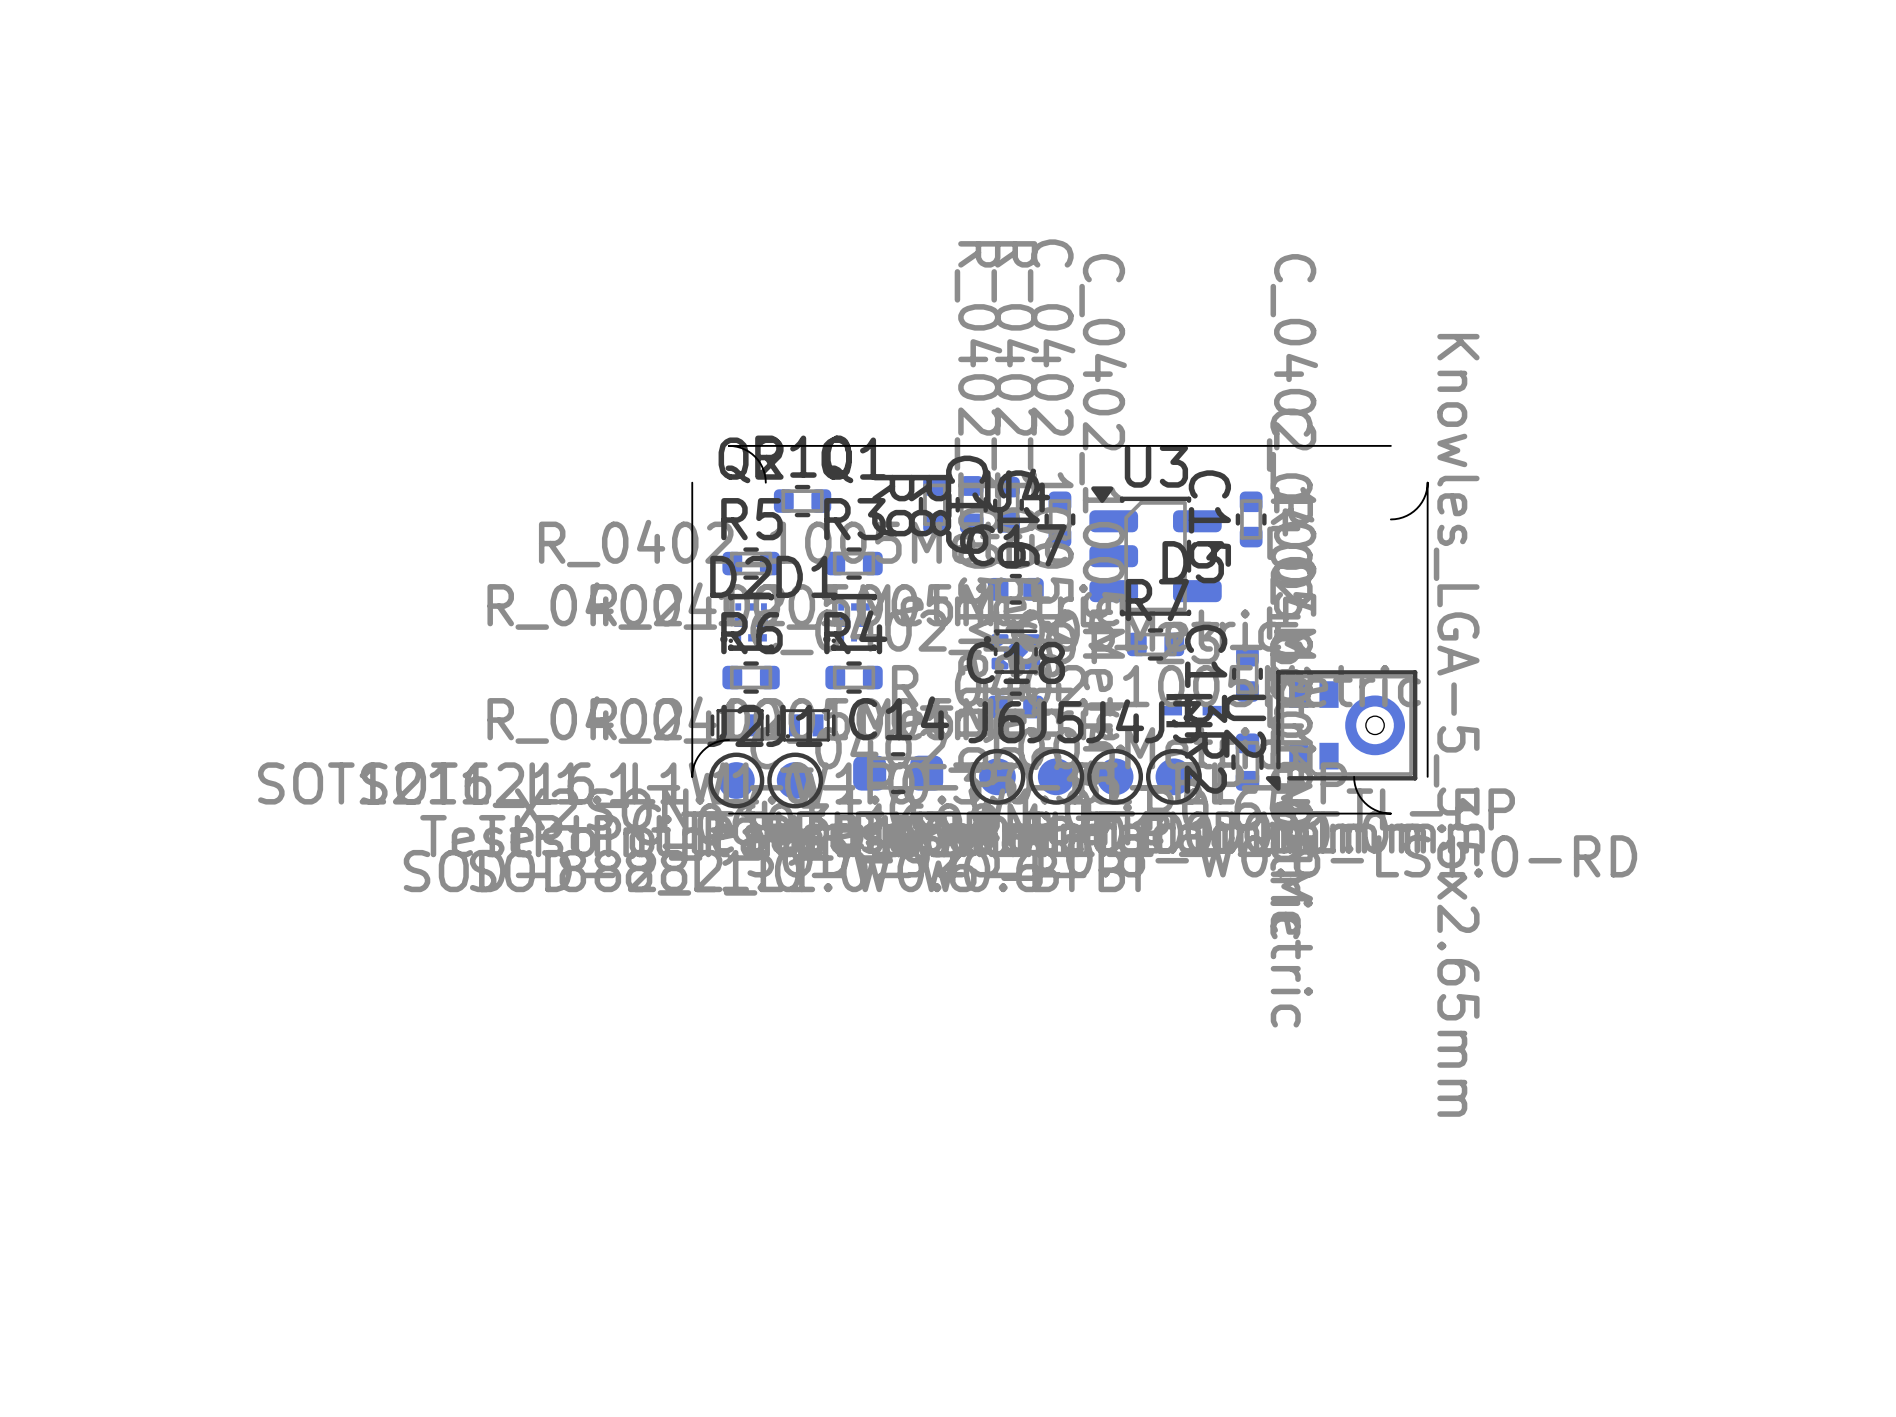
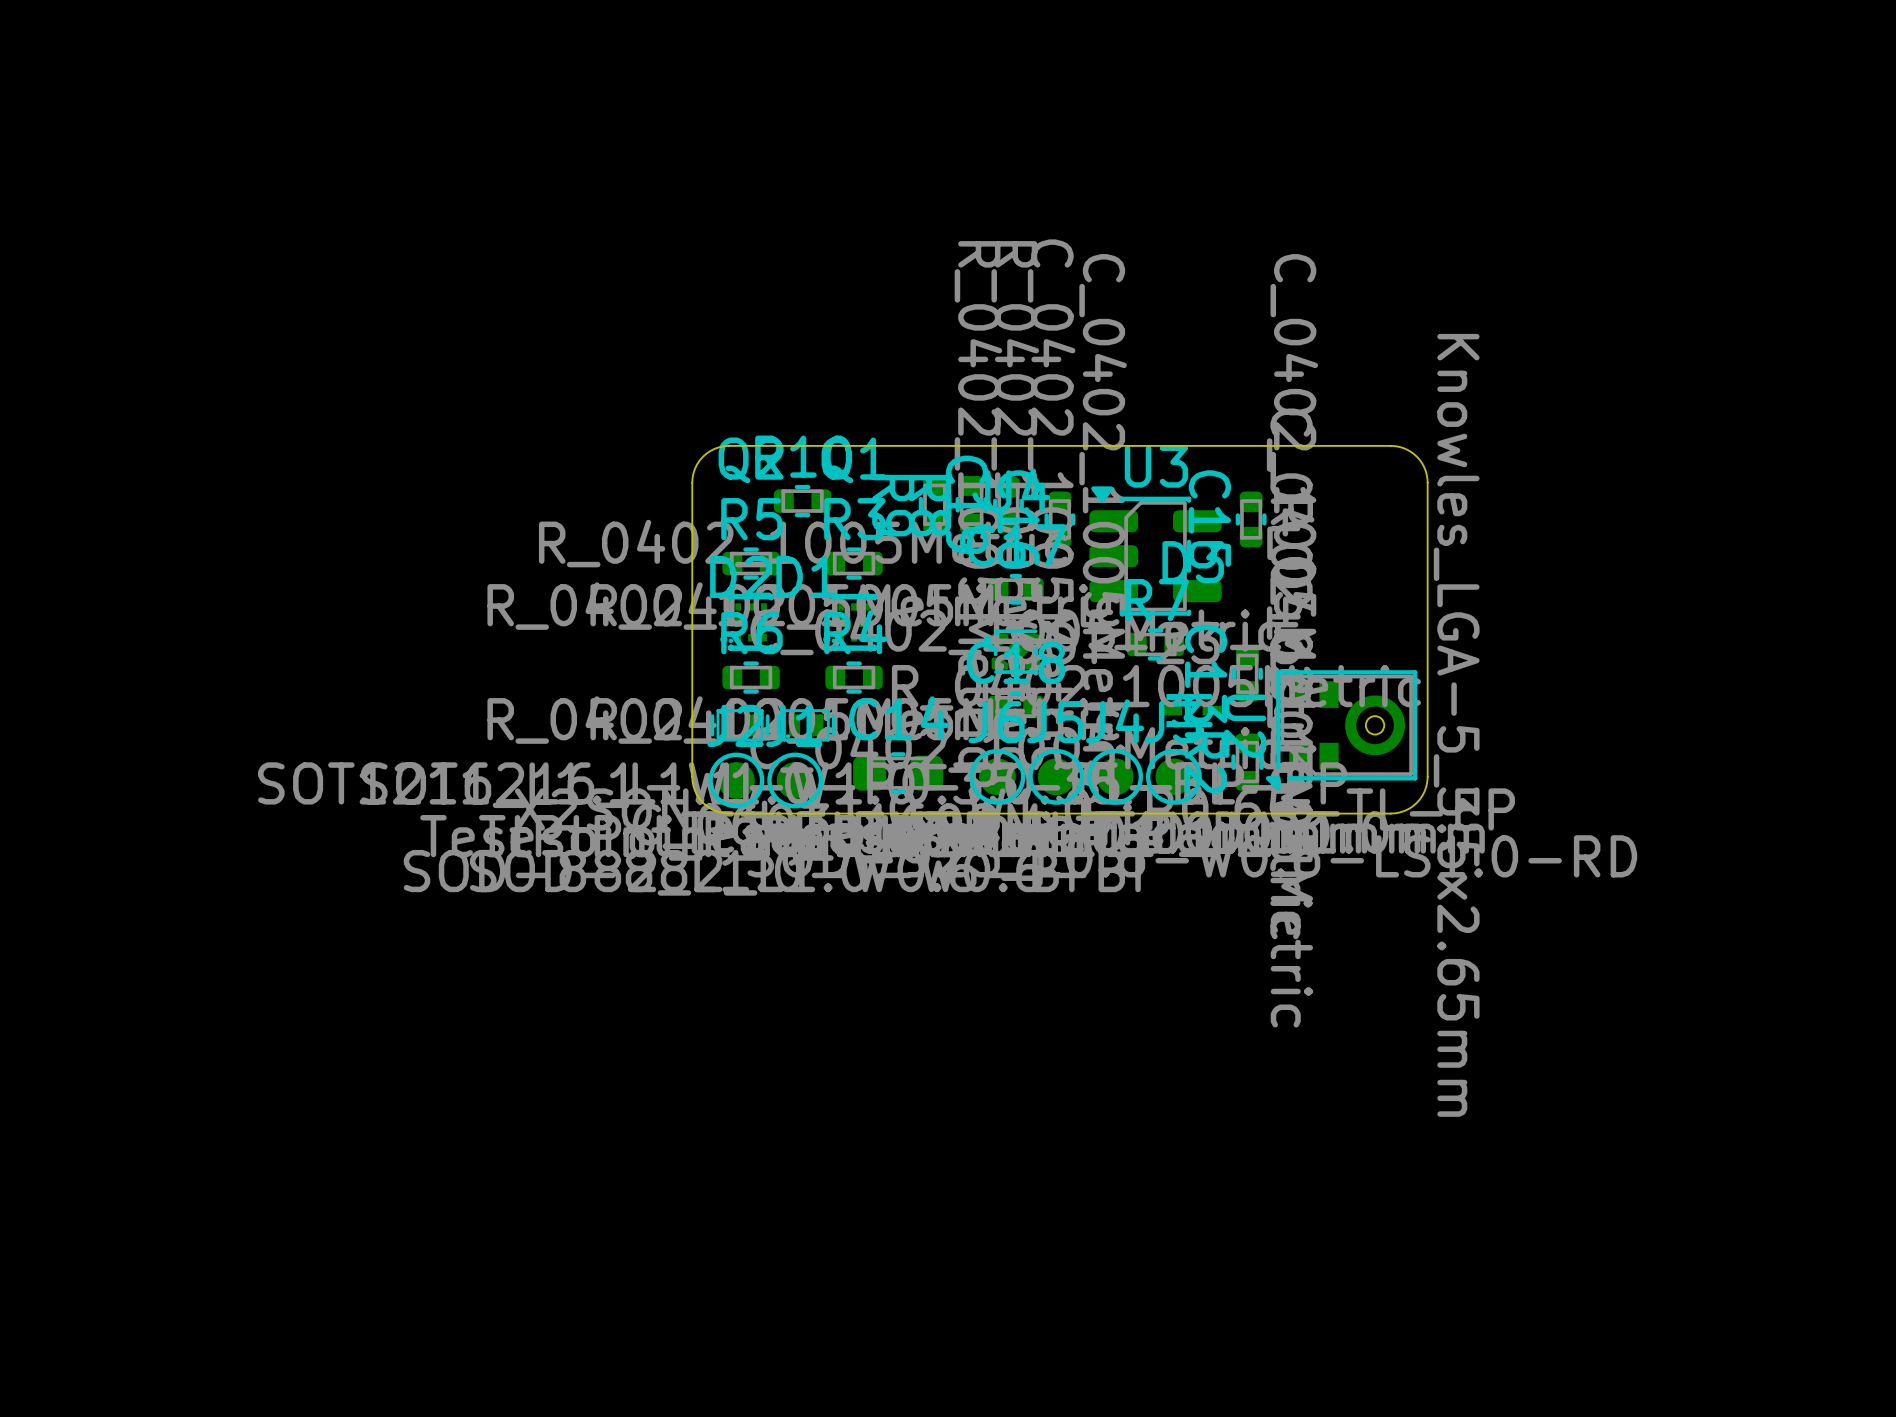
board edge: (729, 445) (741, 447) (755, 456) (763, 470) (765, 482) -> (729, 445) (714, 448) (703, 456) (695, 468) (692, 482)
board edge: (1427, 482) (1424, 498) (1416, 508) (1406, 515) (1390, 519) -> (1427, 482) (1425, 470) (1416, 456) (1406, 449) (1390, 445)
board edge: (729, 740) (713, 743) (703, 750) (695, 760) (692, 776) -> (729, 813) (714, 810) (703, 802) (695, 790) (692, 776)
board edge: (1354, 776) (1357, 792) (1364, 802) (1378, 811) (1390, 813) -> (1427, 776) (1424, 790) (1416, 802) (1404, 810) (1390, 813)

